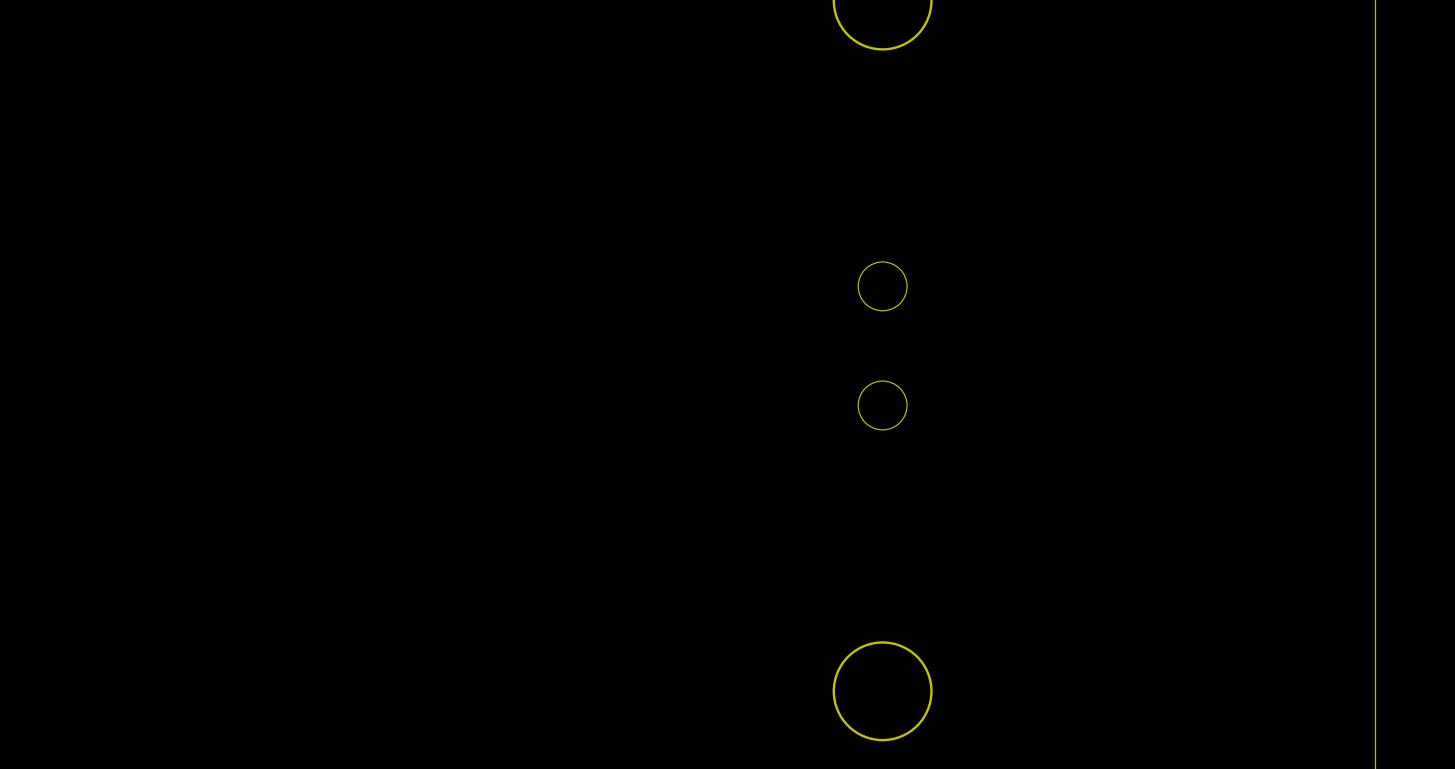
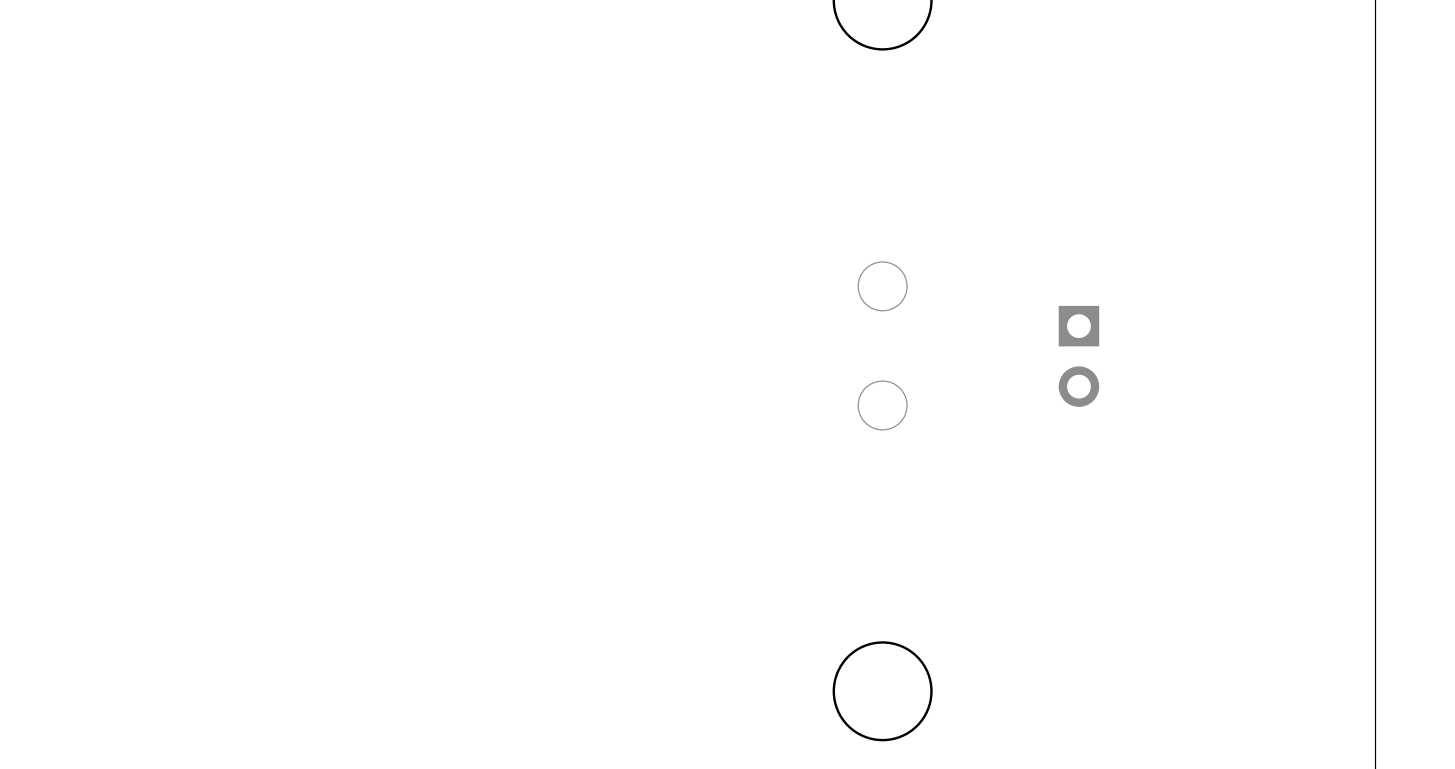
part: none -> (1078, 356)

